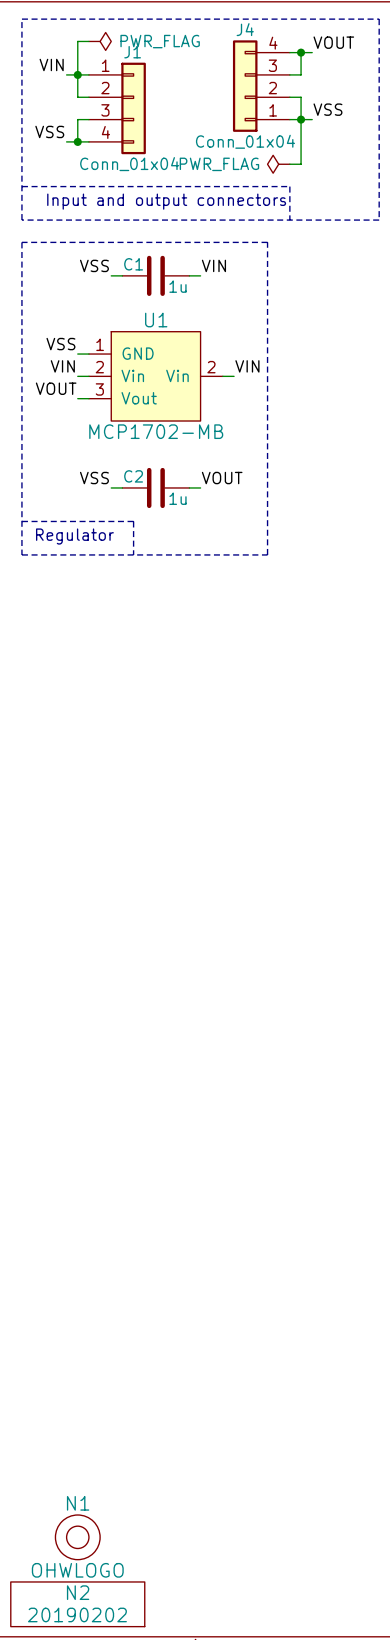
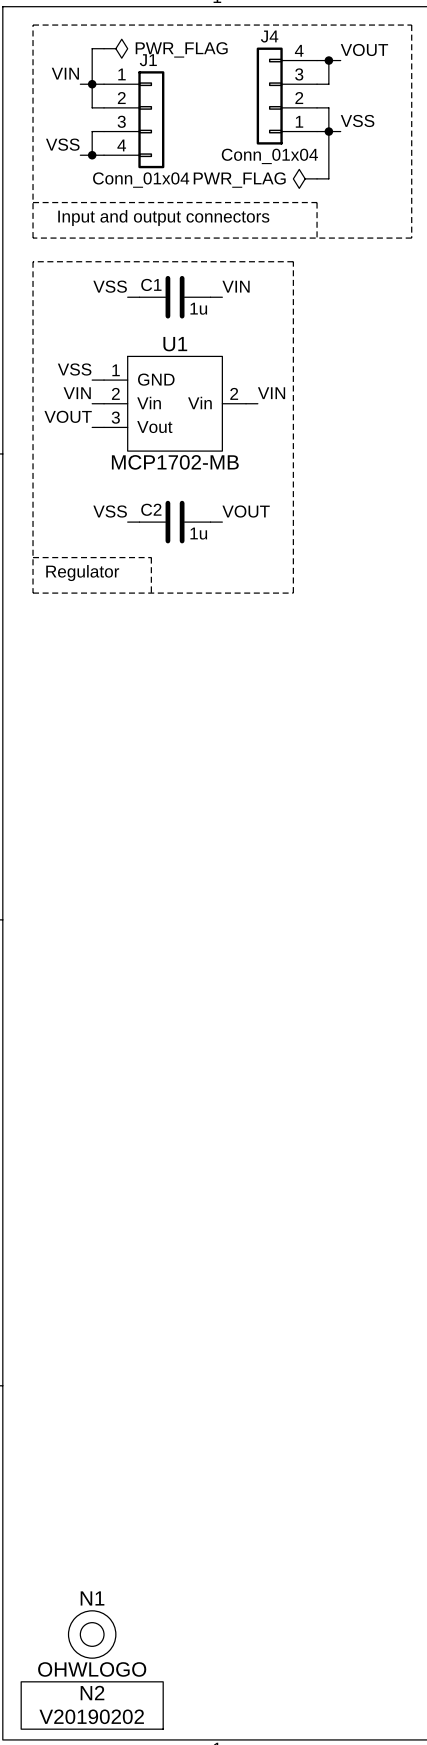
N2 value: 20190202 (77, 1614) -> V20190202 (91, 1716)

